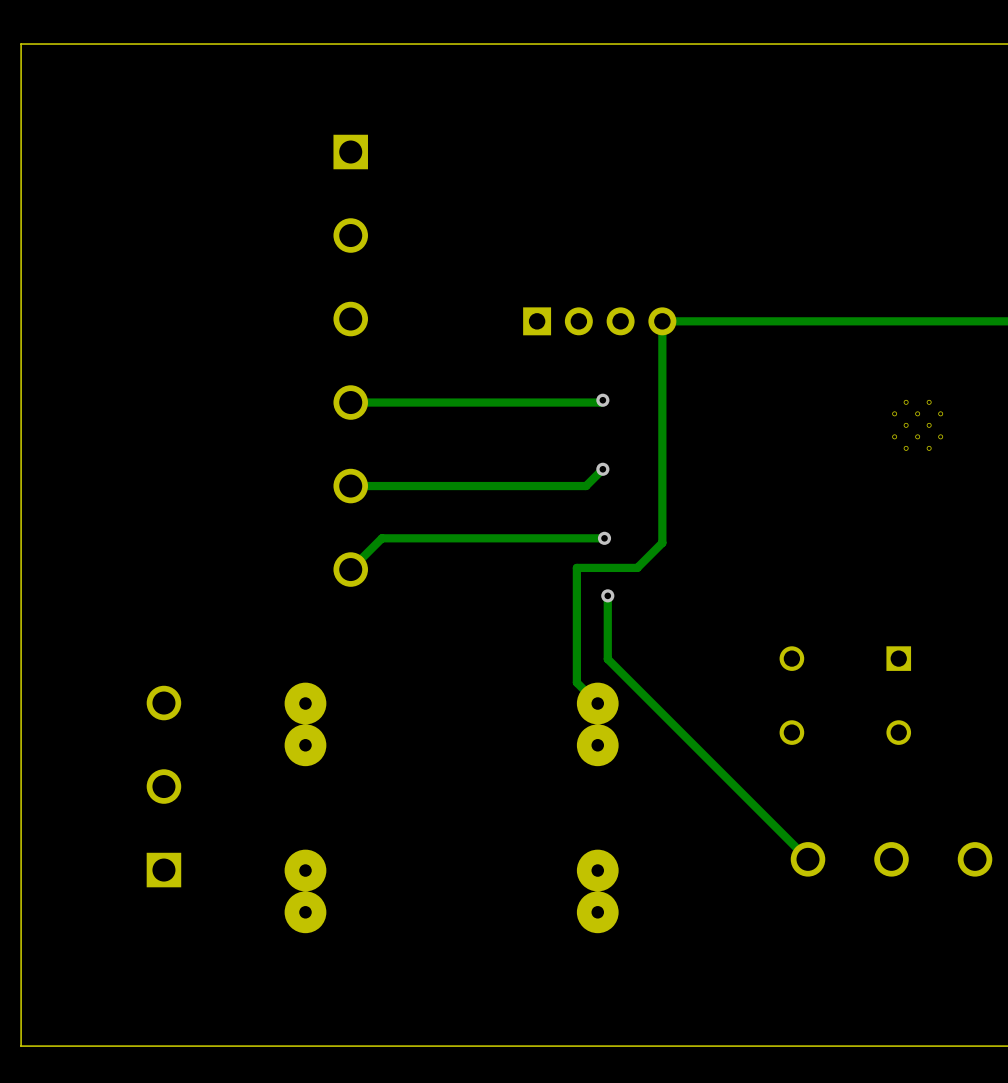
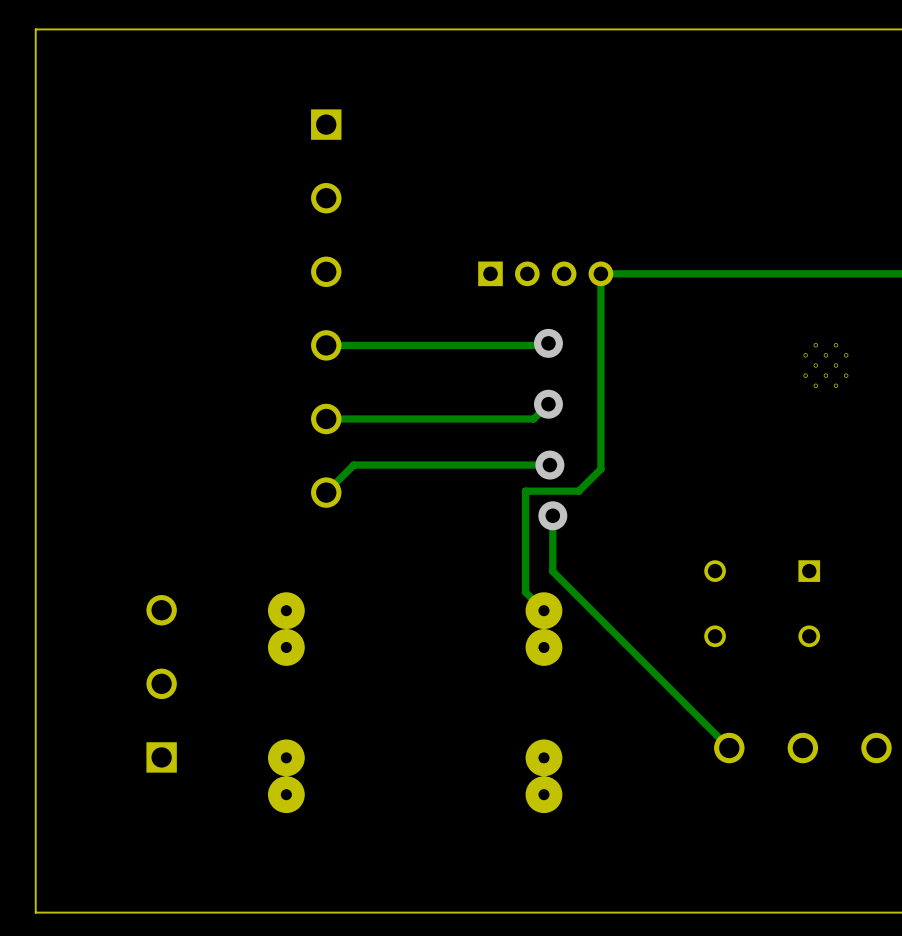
via size: [596, 393, 610, 407] -> [533, 328, 563, 358]
via size: [596, 462, 610, 476] -> [533, 389, 563, 419]
via size: [597, 531, 612, 545] -> [535, 450, 565, 480]
via size: [601, 589, 615, 603] -> [538, 501, 568, 531]

